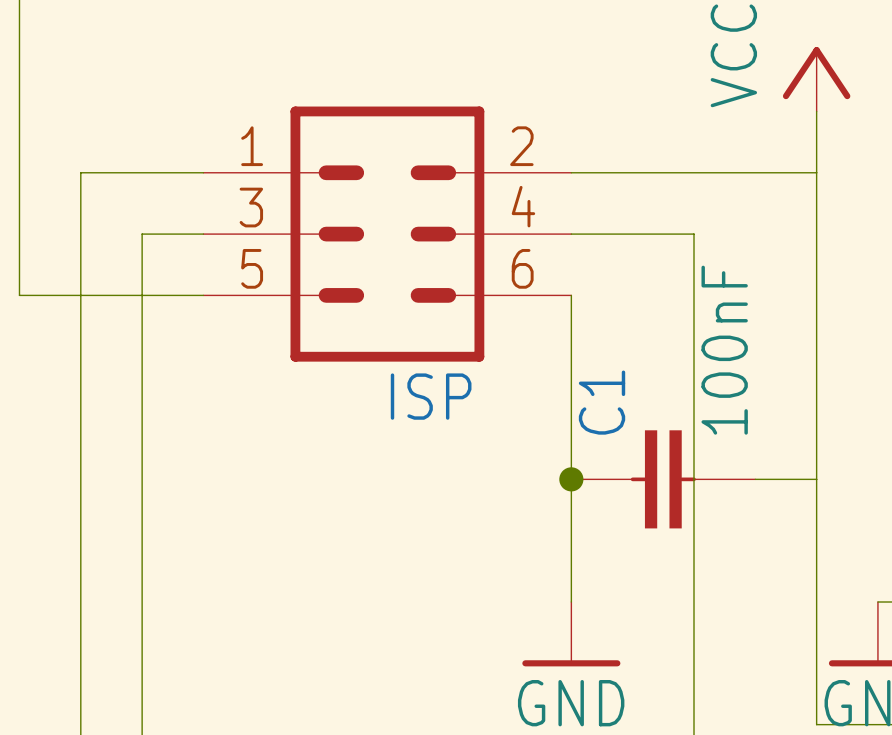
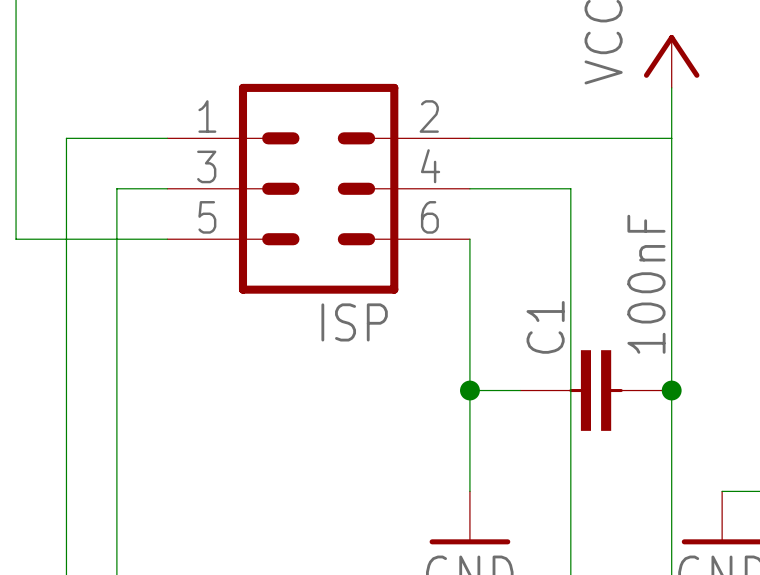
C1 position: (663, 479) -> (596, 390)
junction: none -> (671, 390)

